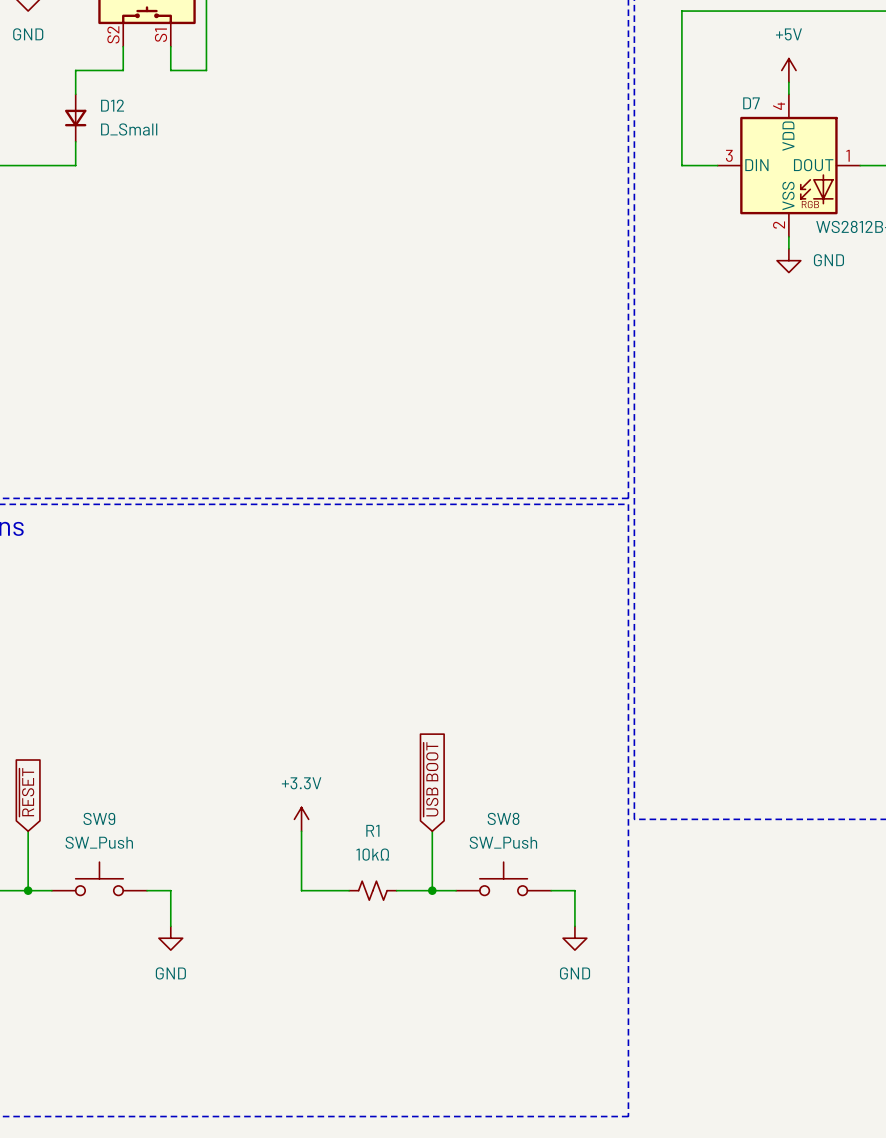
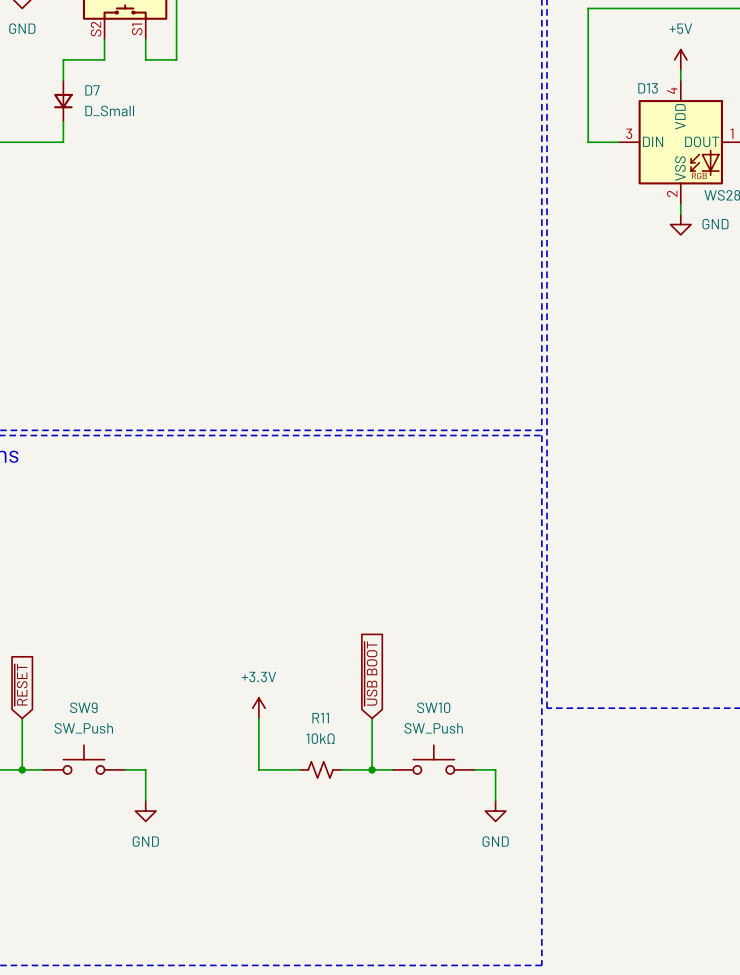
D7 name: D7 (751, 103) -> D13 (648, 88)
D12 name: D12 (112, 105) -> D7 (92, 90)
SW8 name: SW8 (503, 818) -> SW10 (433, 707)
R1 name: R1 (372, 830) -> R11 (320, 718)

